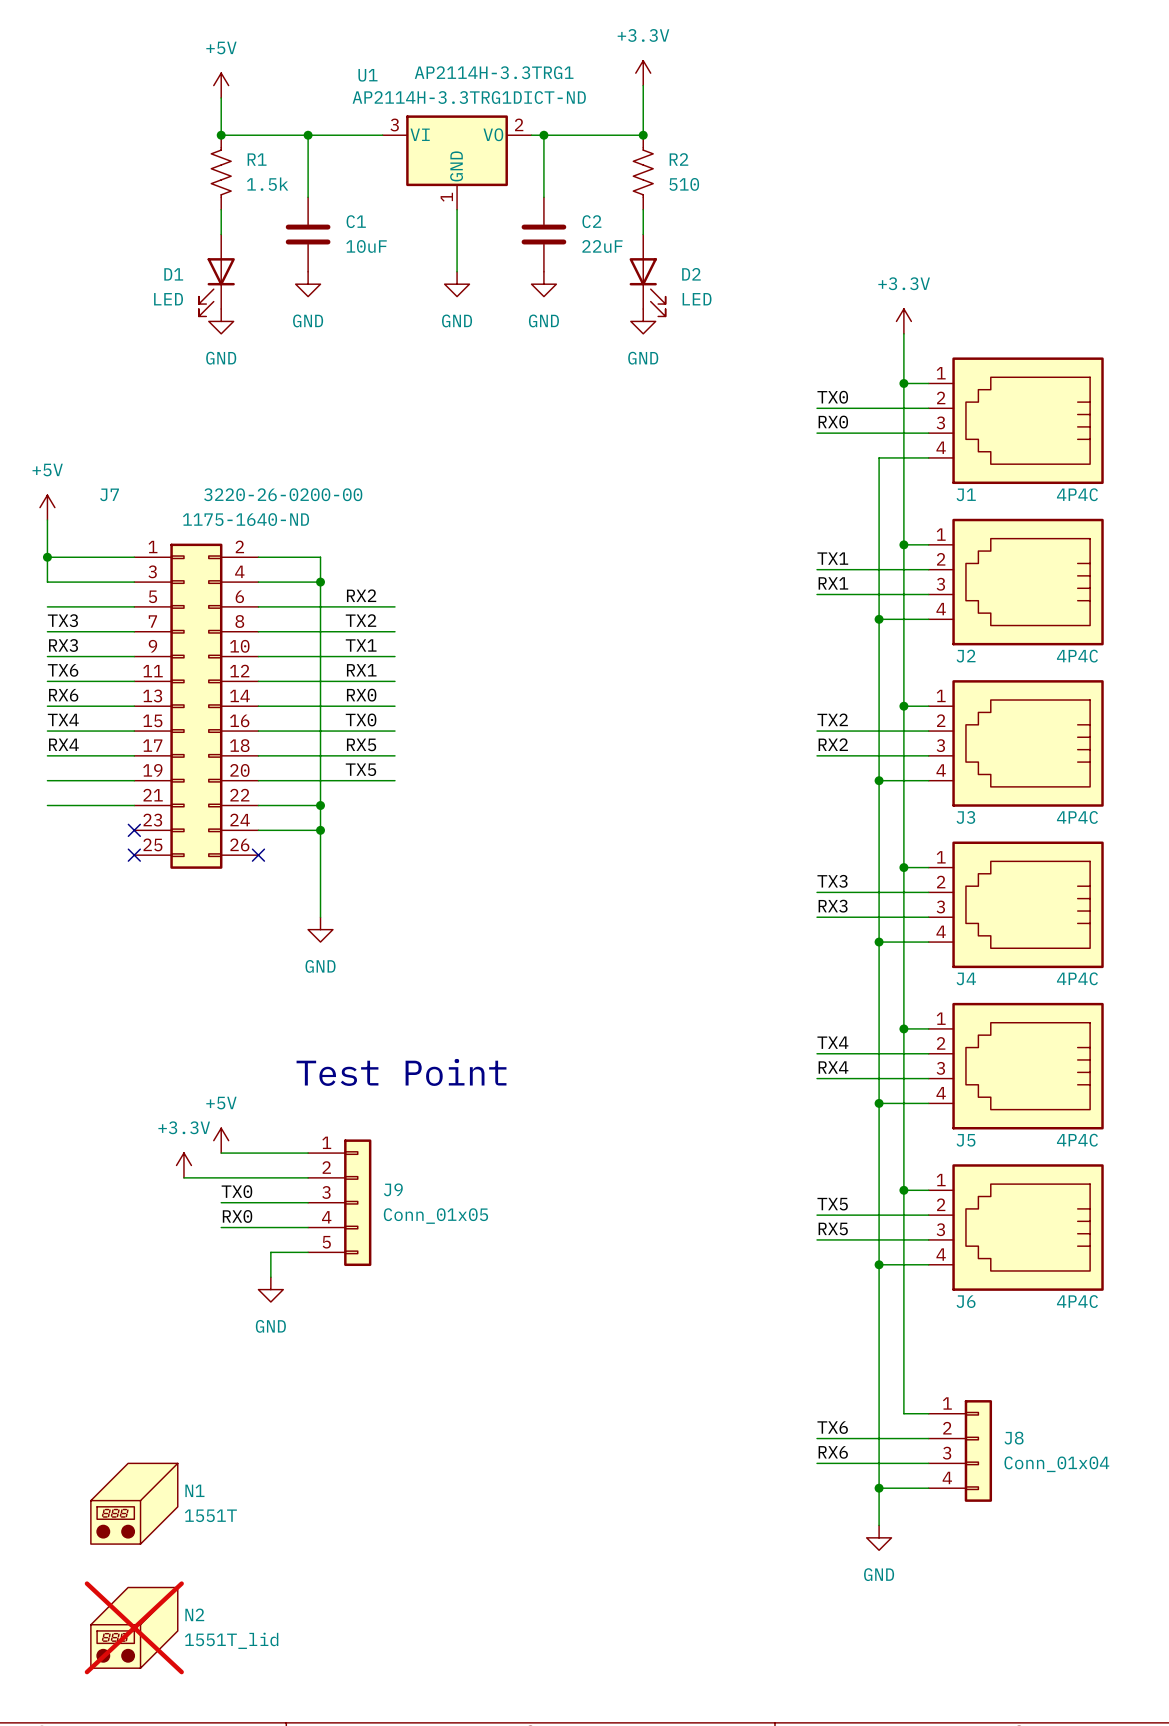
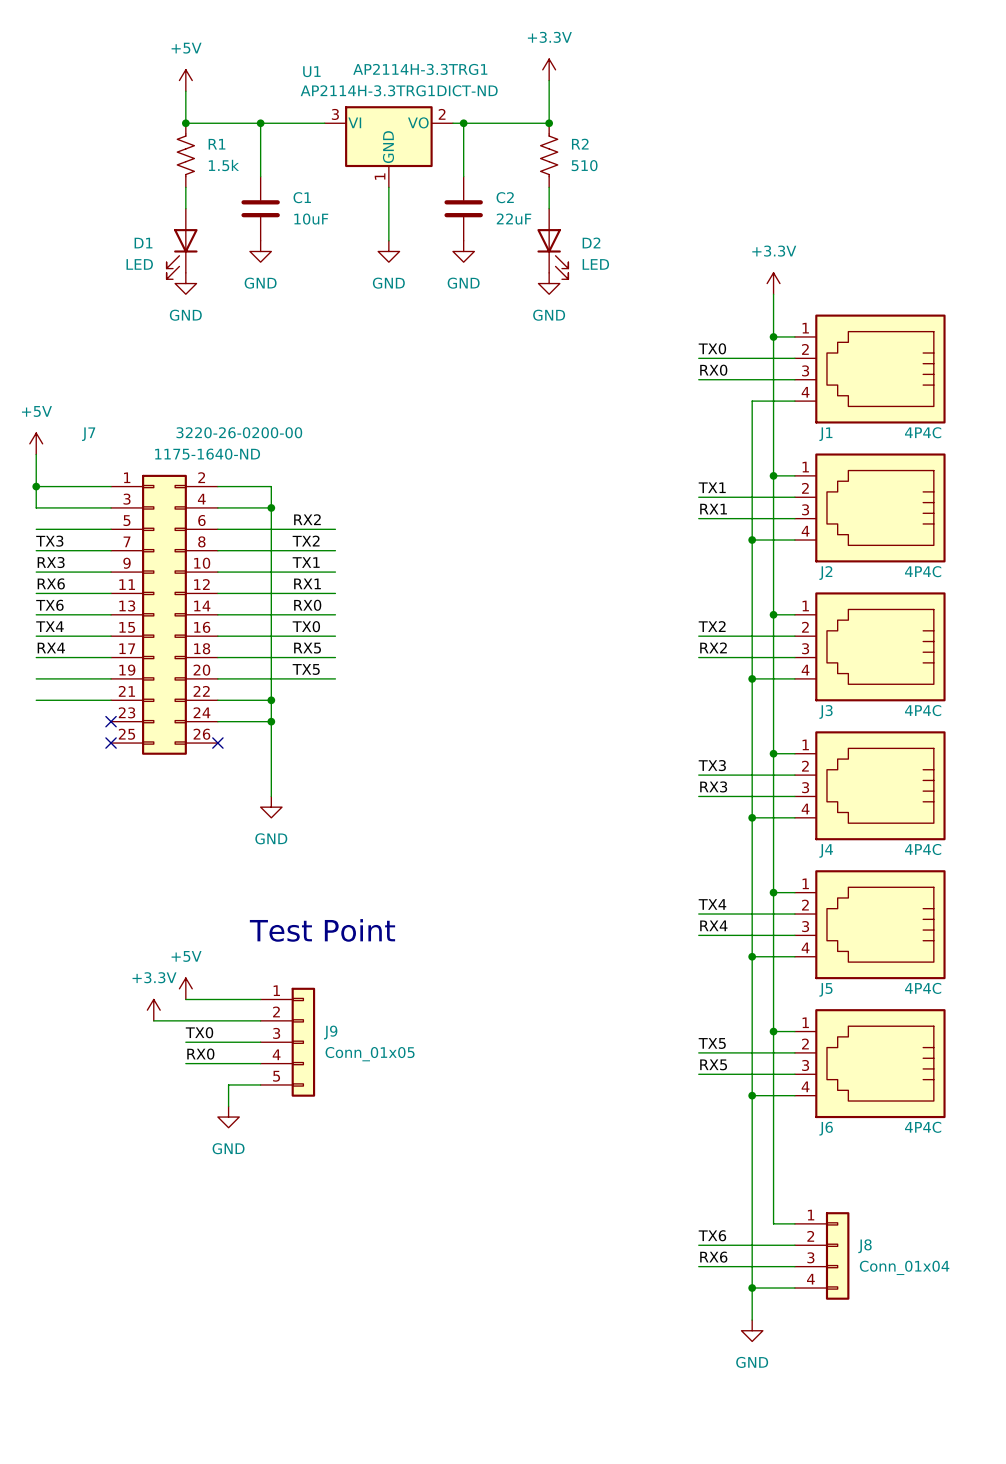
label: TX6 (63, 670) -> RX6 (51, 583)
label: RX6 (63, 695) -> TX6 (49, 605)
N1: 1551T (134, 1503) -> none
N2: 1551T_lid (134, 1627) -> none

